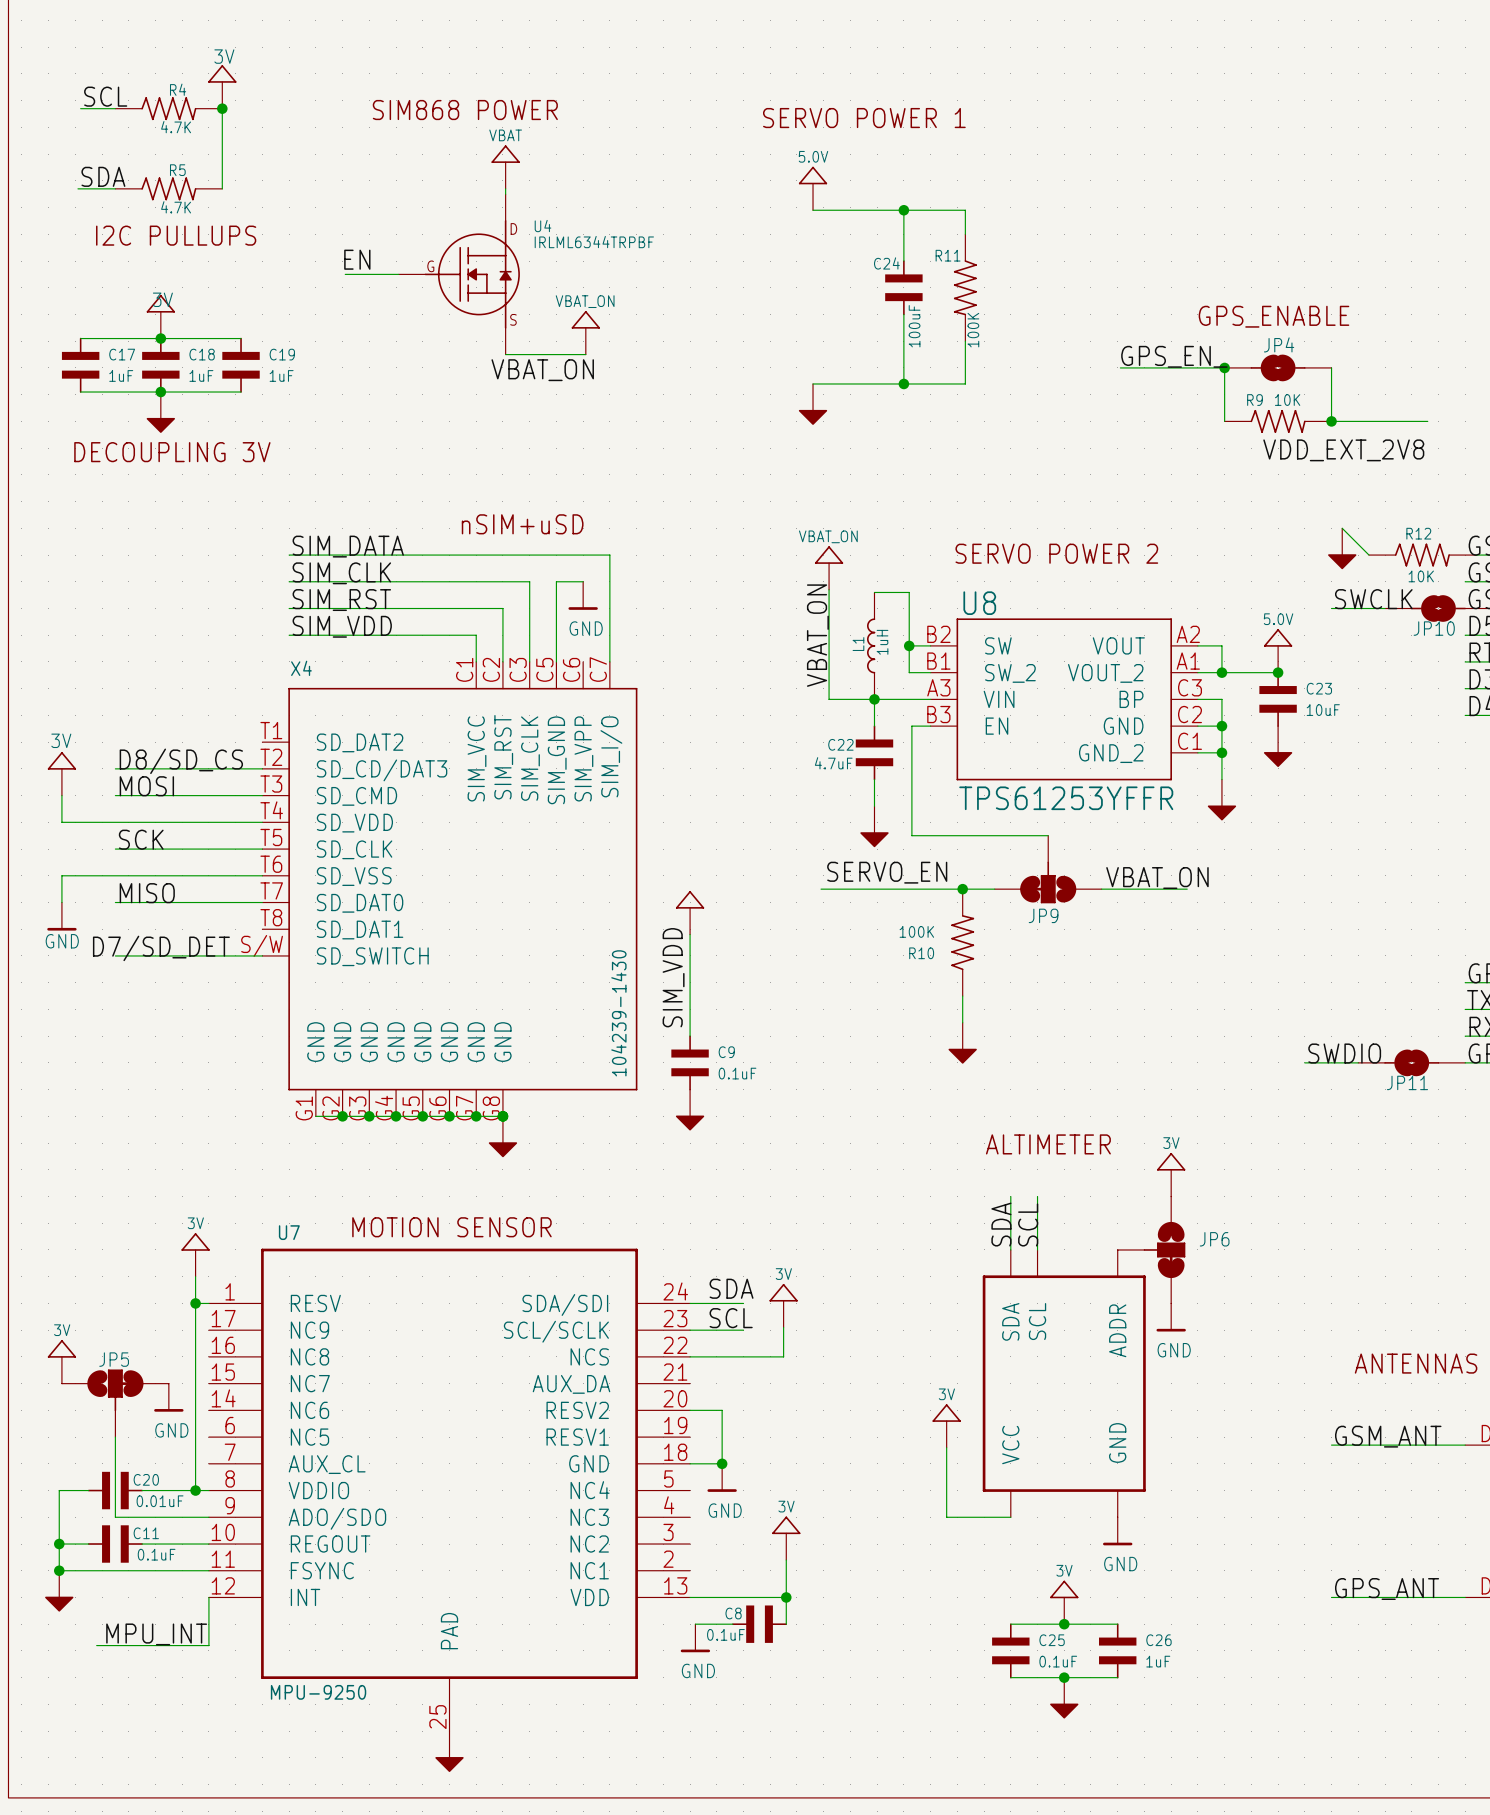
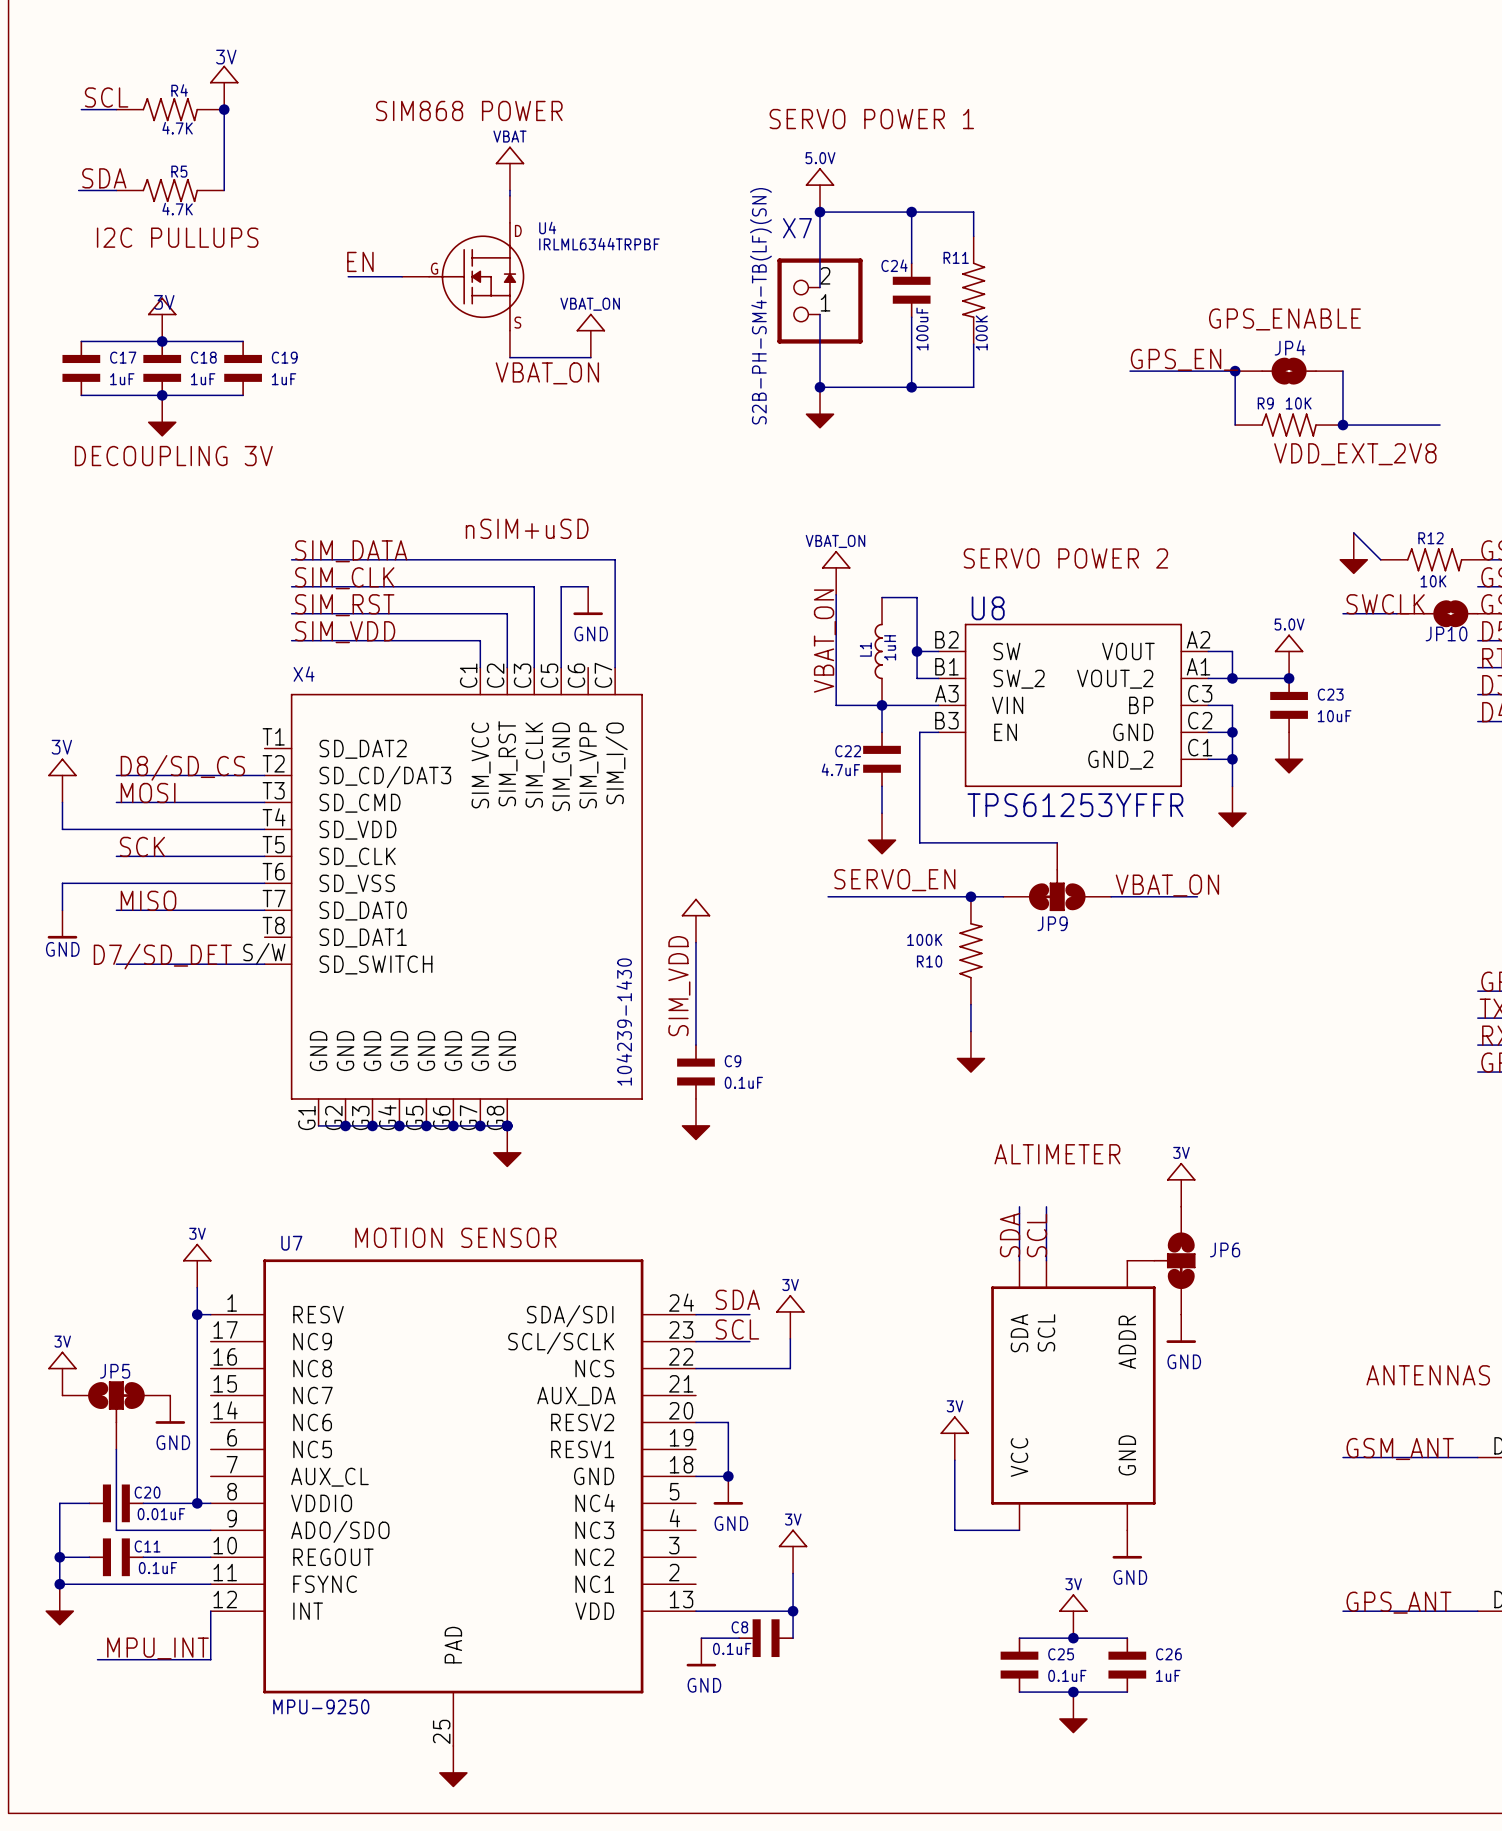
wire: none -> (820, 212) (820, 287)
junction: none -> (820, 212)
X7: none -> S2B-PH-SM4-TB(LF)(SN) (820, 301)
wire: none -> (820, 314) (820, 387)
junction: none -> (820, 387)
label: SWDIO (1344, 1053) -> none
wire: (1304, 1062) (1358, 1062) -> none
JP11: (1411, 1062) -> none

